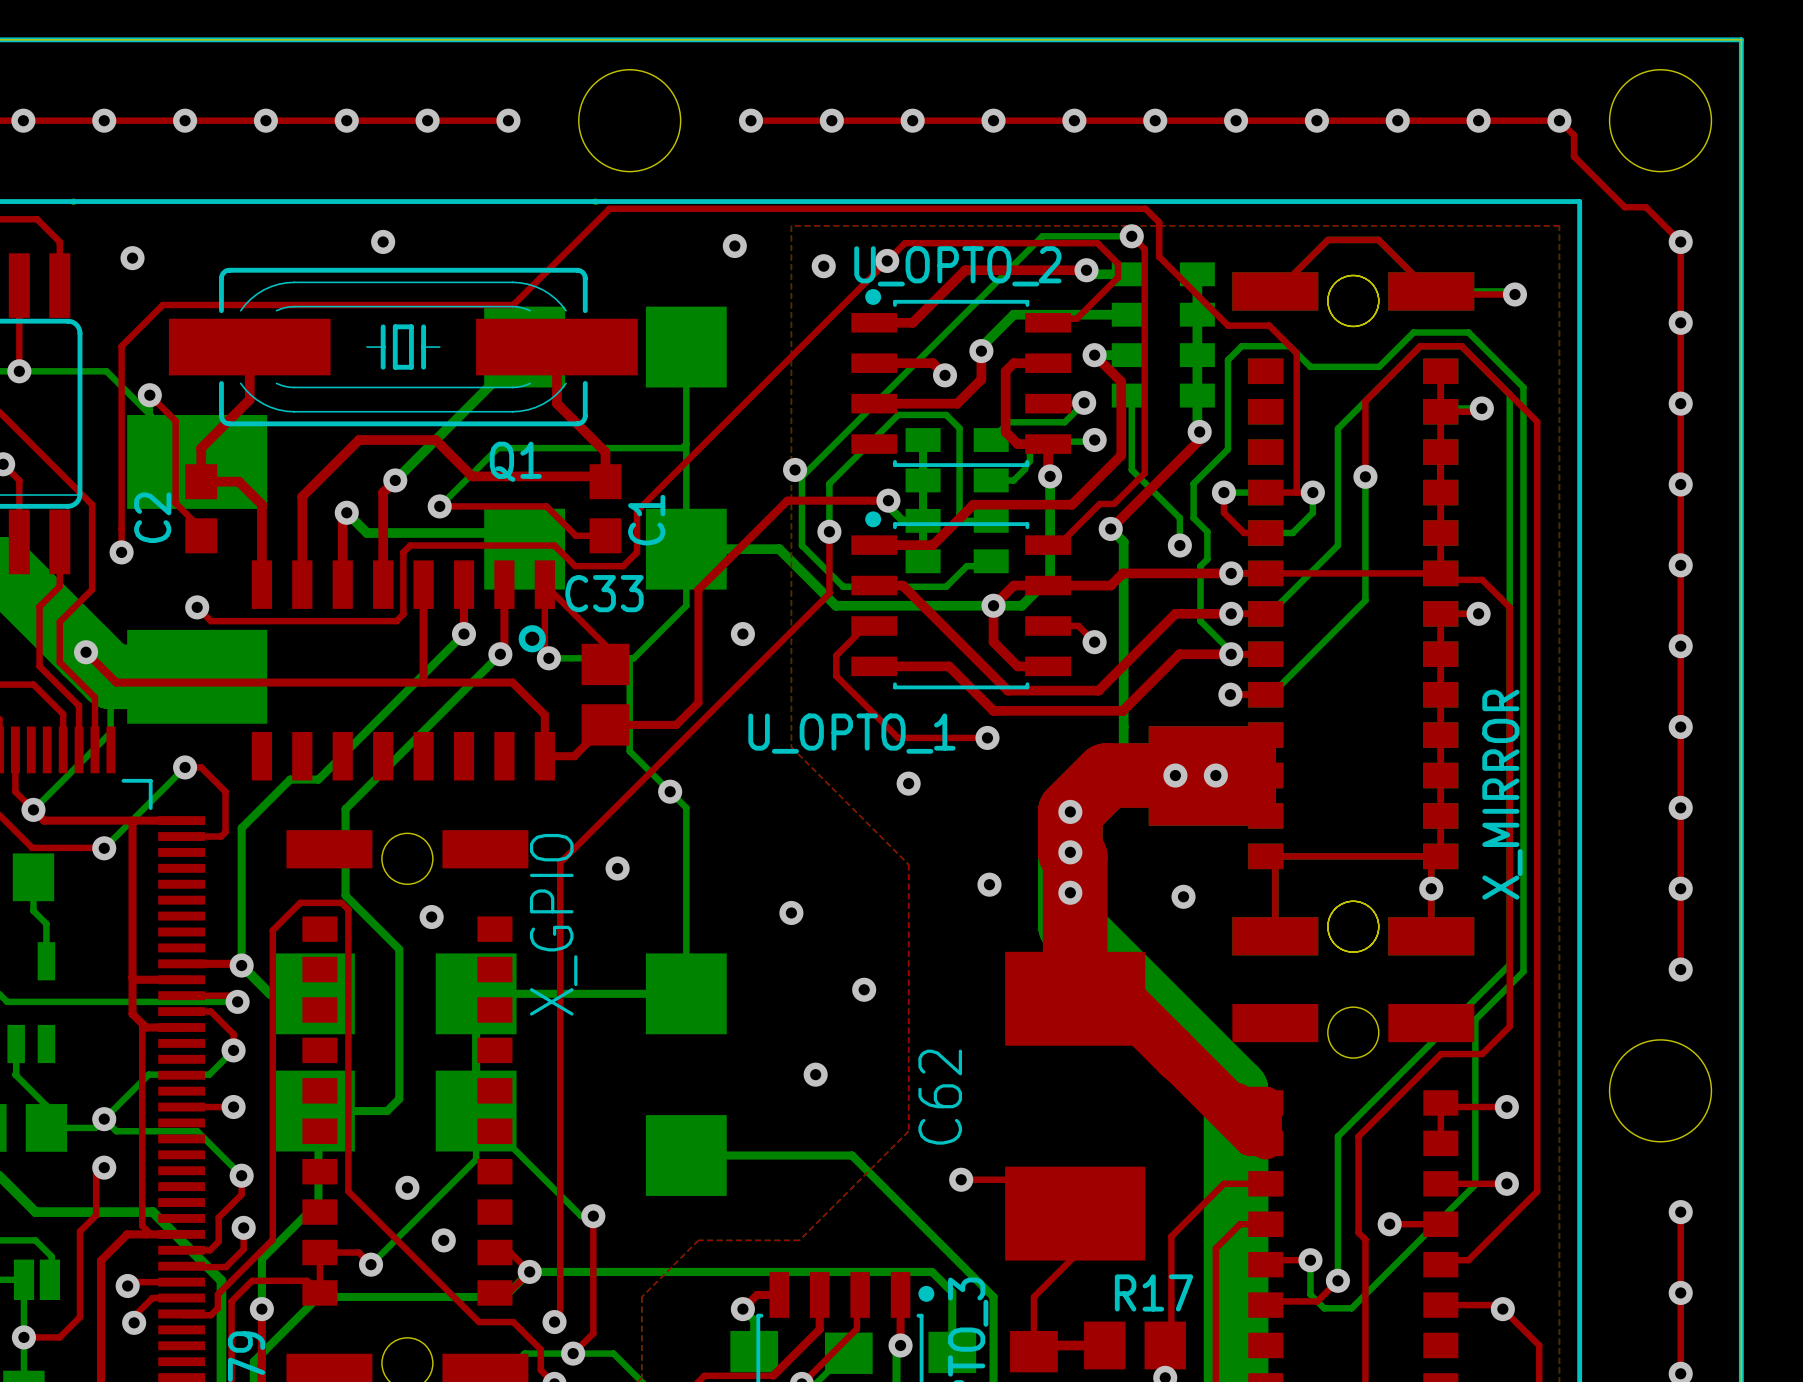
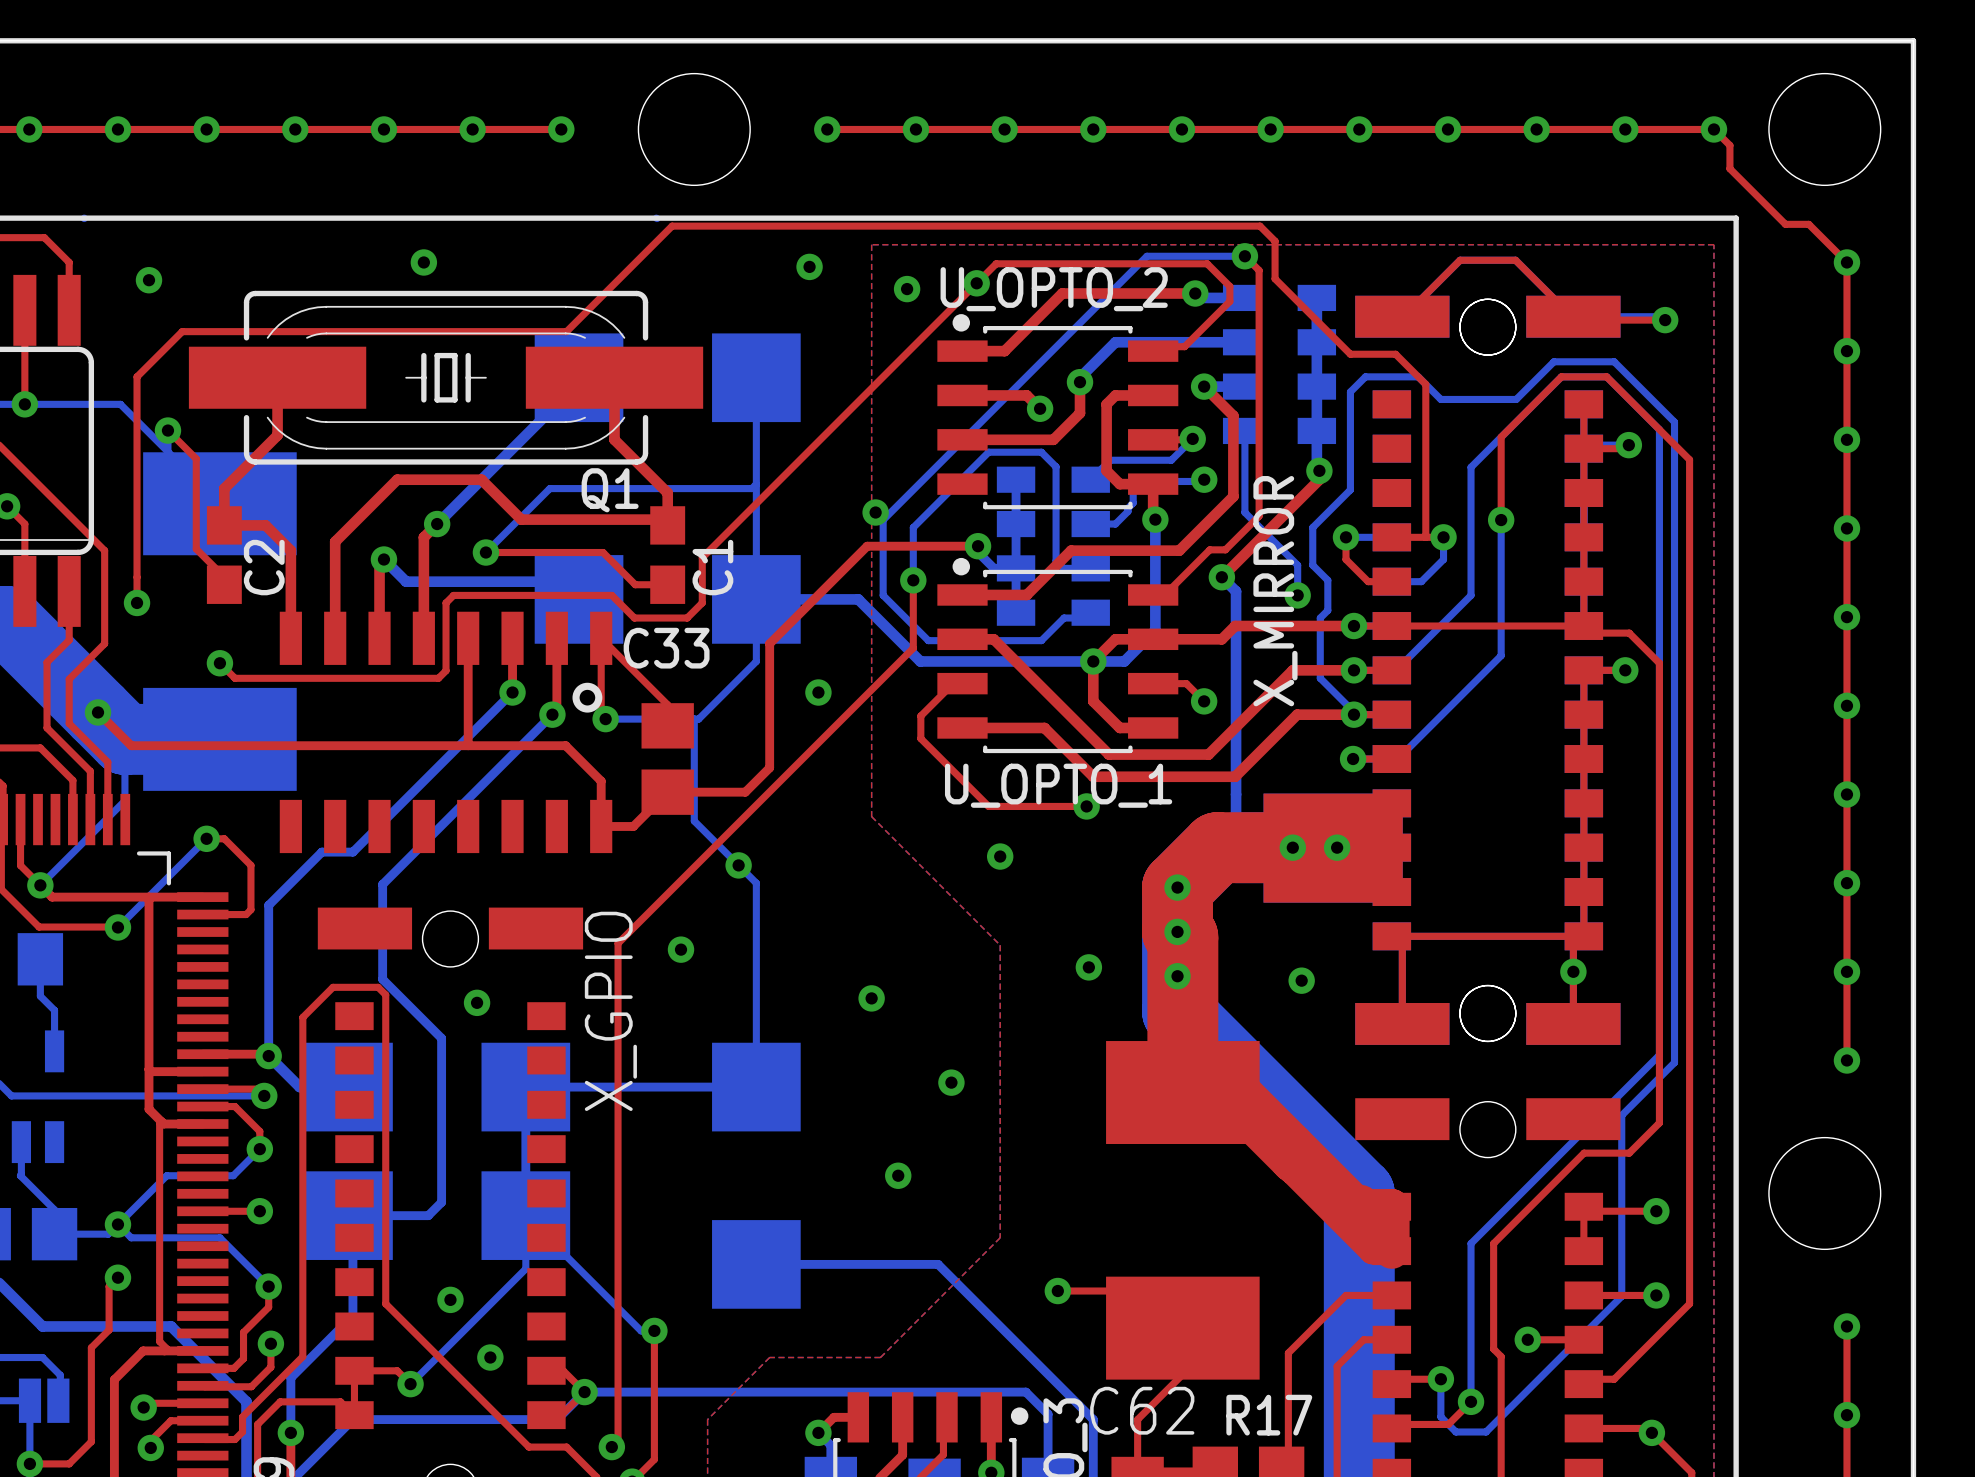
Q1 name position: Q1 (515, 461) -> Q1 (610, 490)
C2 name position: C2 (152, 517) -> C2 (264, 567)
U_OPTO_1 name position: U_OPTO_1 (851, 733) -> U_OPTO_1 (1058, 785)
X_MIRROR name position: X_MIRROR (1502, 794) -> X_MIRROR (1275, 591)
C62 name rotation: 0° (940, 1097) -> 90° clockwise (1142, 1410)
C62 name position: C62 (940, 1097) -> C62 (1142, 1410)

